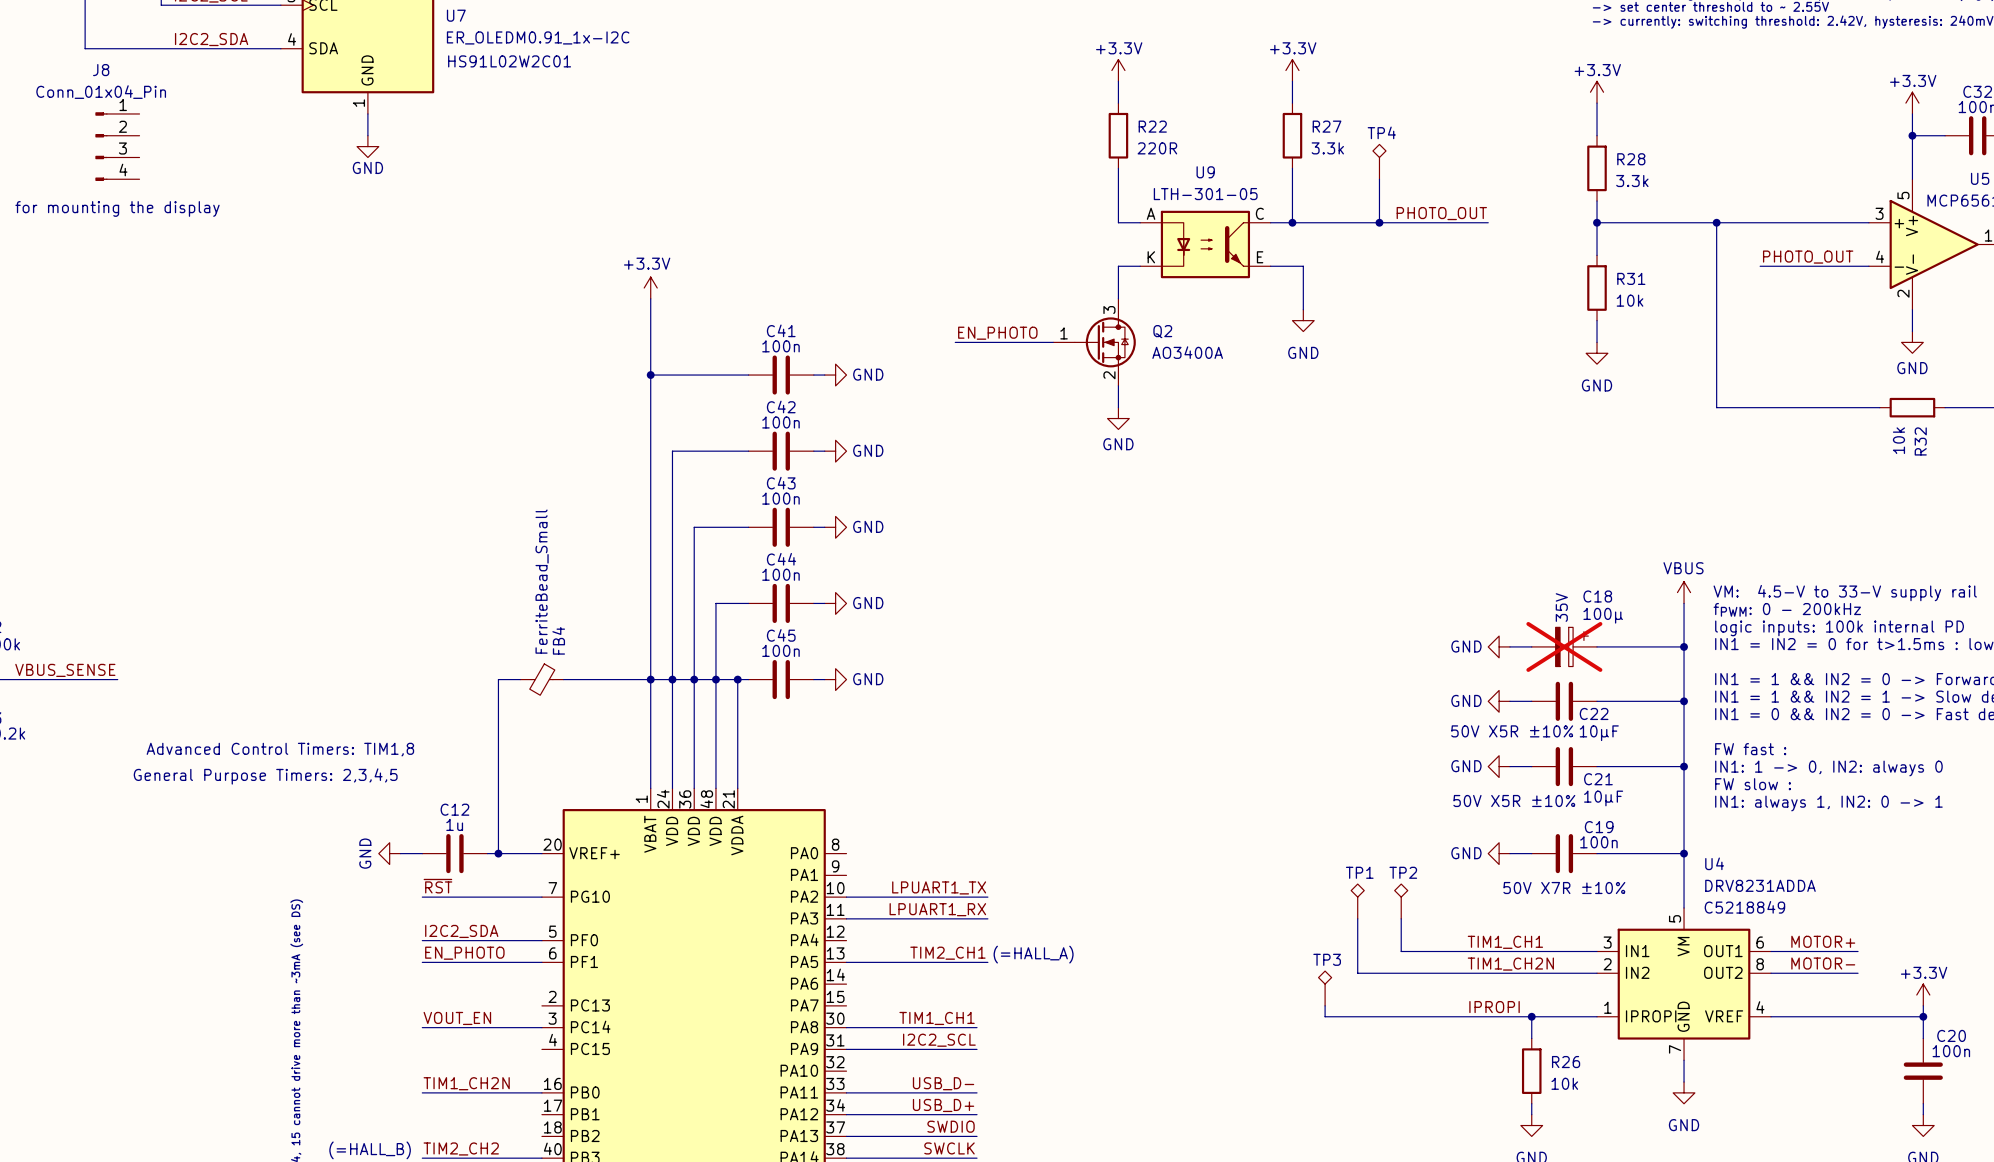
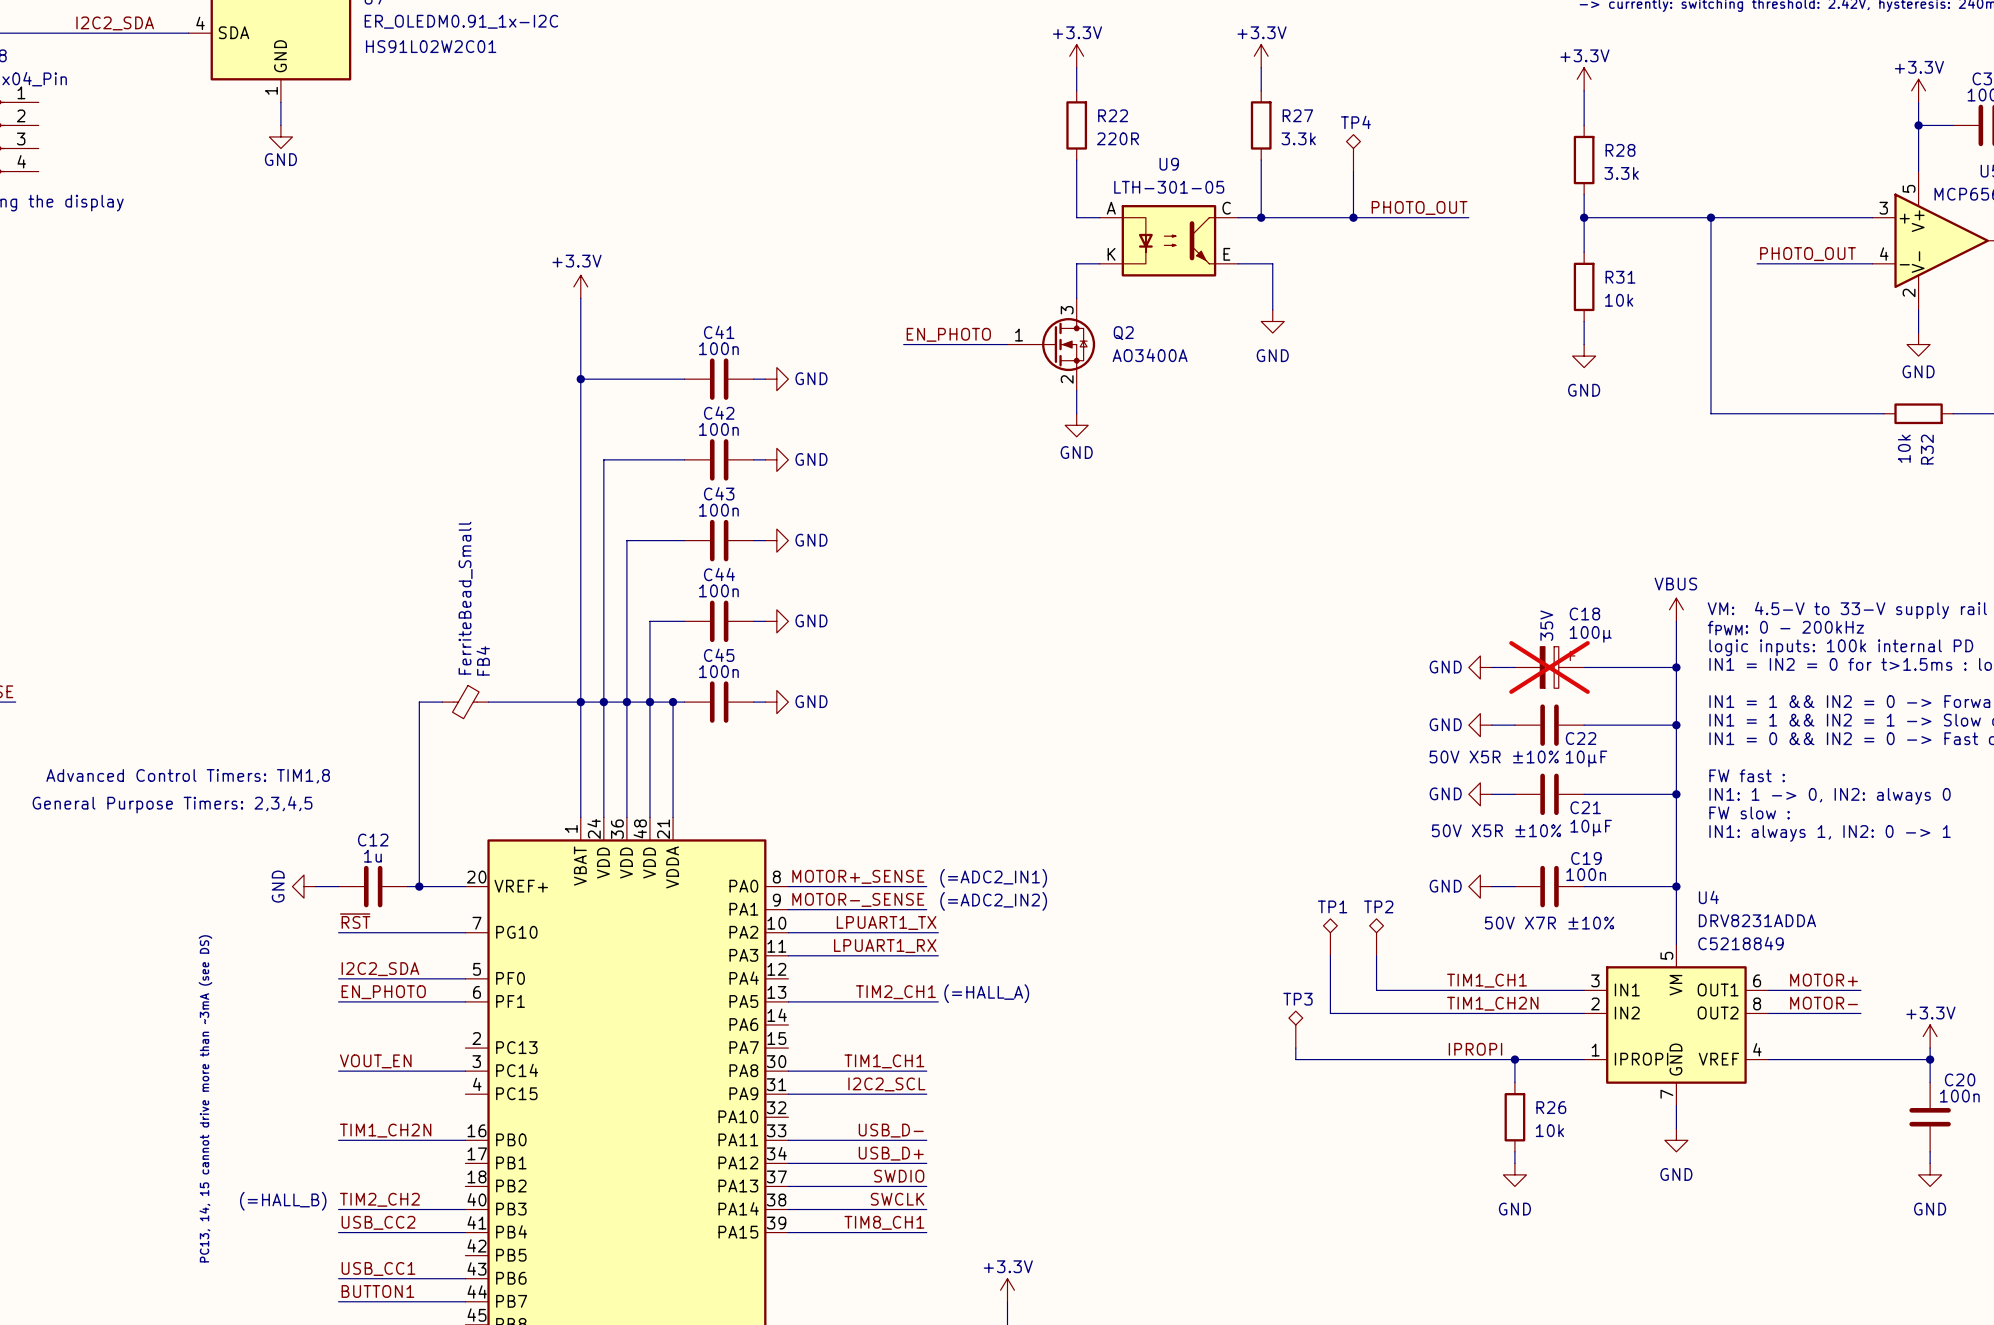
label: none -> MOTOR+_SENSE (858, 876)
text: none -> (=ADC2_IN1) (993, 878)
wire: none -> (788, 886) (926, 886)
label: none -> MOTOR-_SENSE (858, 899)
text: none -> (=ADC2_IN2) (993, 901)
wire: none -> (788, 909) (926, 909)

